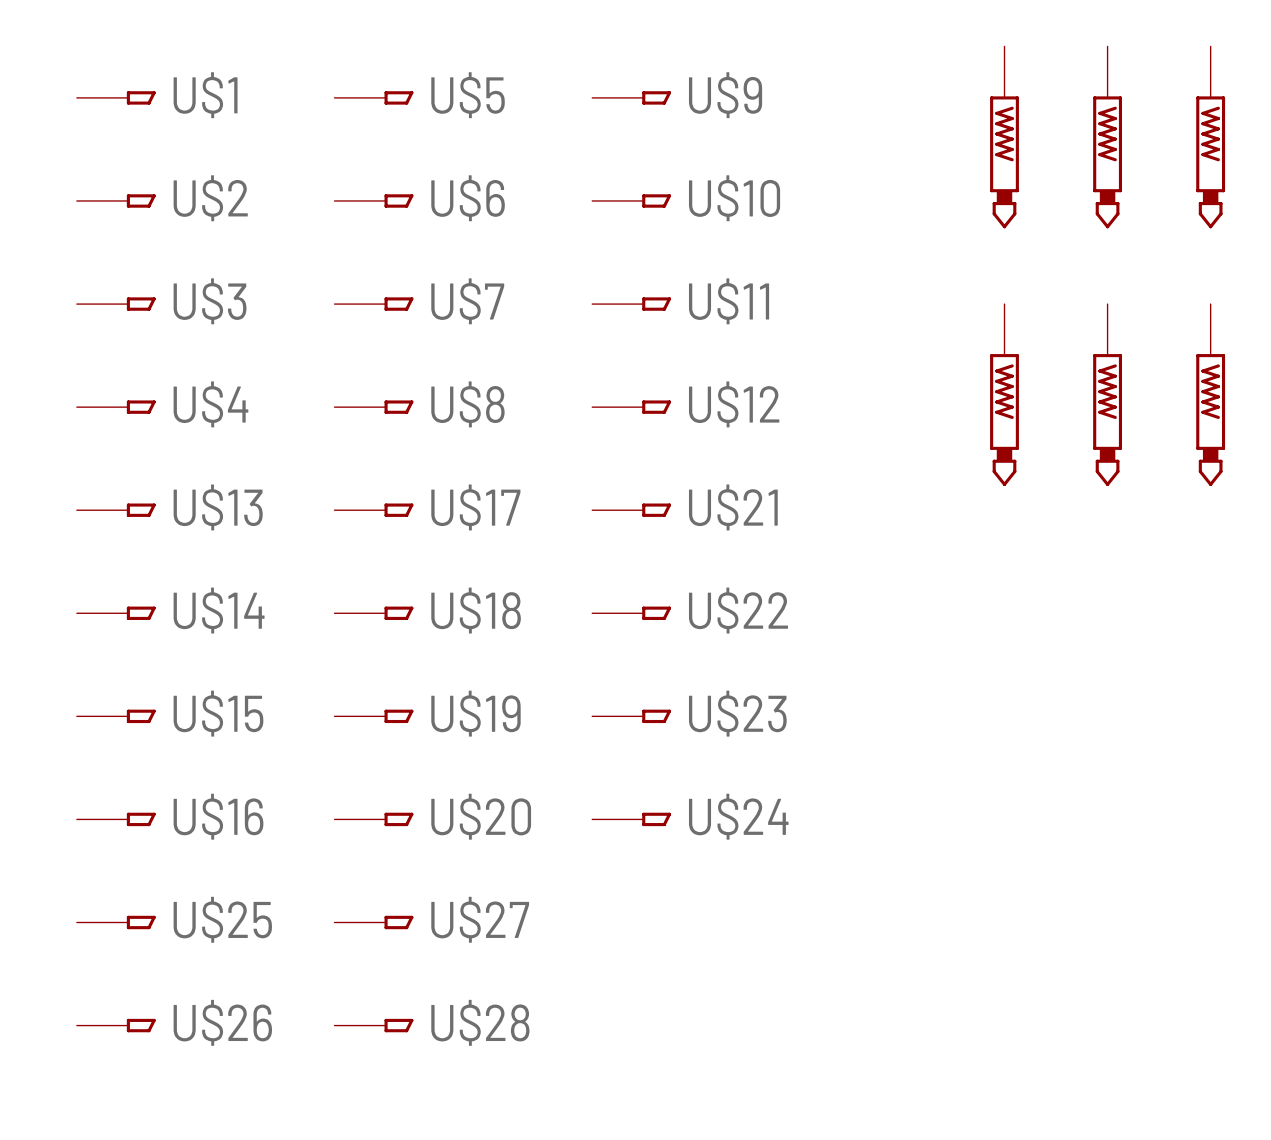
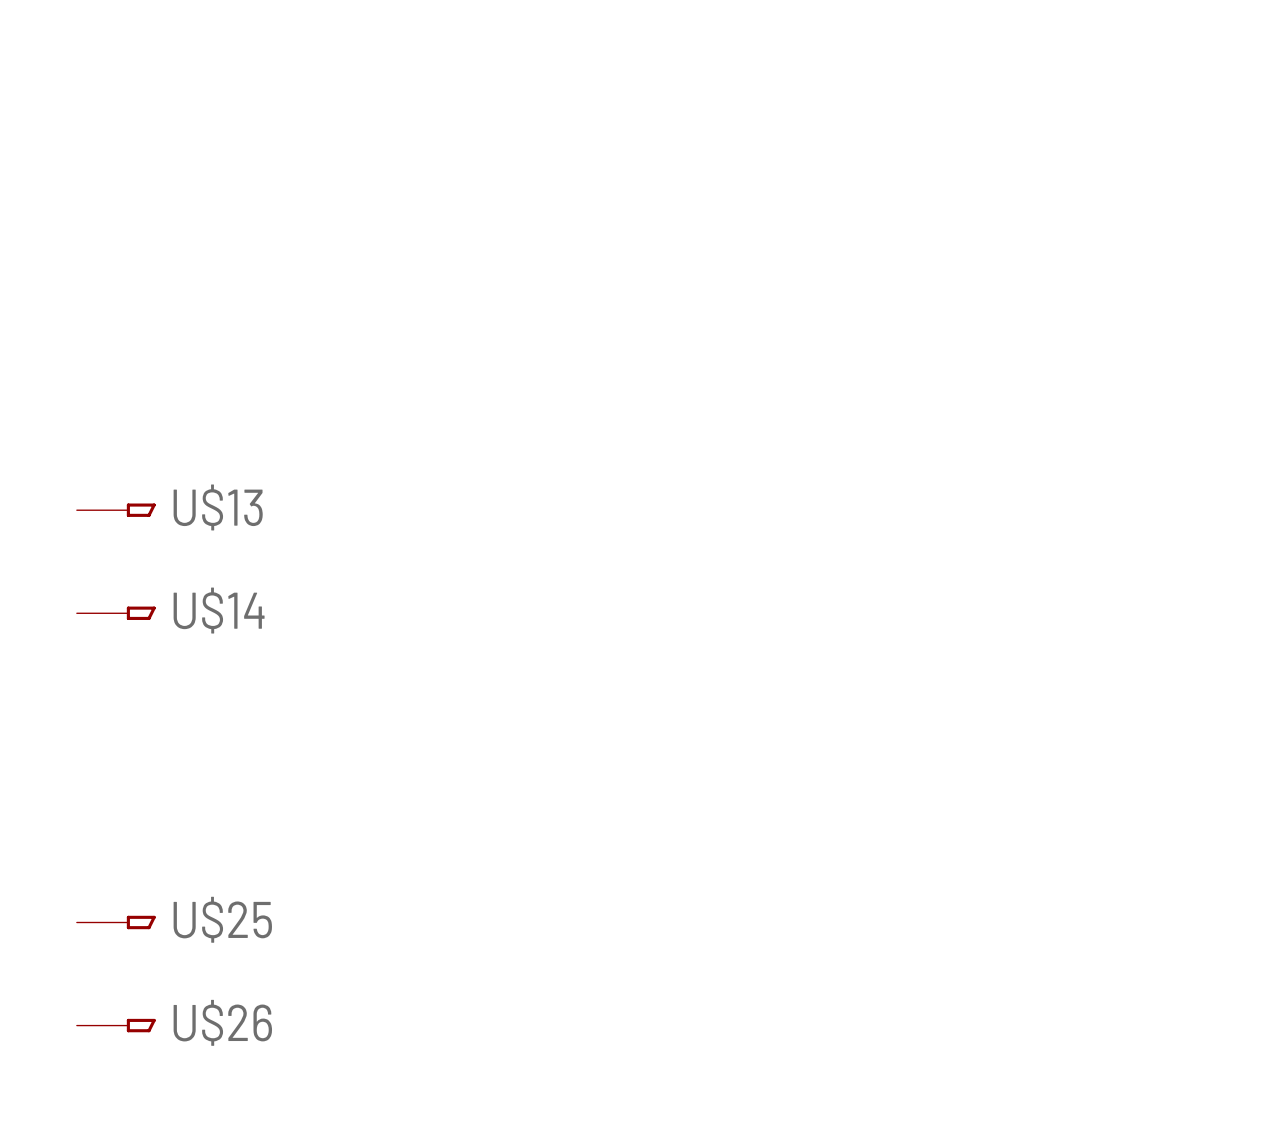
U$1: (116, 97) -> none
U$5: (373, 97) -> none
U$9: (631, 97) -> none
part: (1004, 137) -> none
part: (1107, 137) -> none
part: (1210, 137) -> none
U$2: (116, 200) -> none
U$6: (373, 200) -> none
U$10: (631, 200) -> none
U$3: (116, 304) -> none
U$7: (373, 304) -> none
U$11: (631, 304) -> none
part: (1004, 395) -> none
part: (1107, 395) -> none
part: (1210, 395) -> none
U$4: (116, 407) -> none
U$8: (373, 407) -> none
U$12: (631, 407) -> none
U$17: (373, 510) -> none
U$21: (631, 510) -> none
U$18: (373, 613) -> none
U$22: (631, 613) -> none
U$15: (116, 716) -> none
U$19: (373, 716) -> none
U$23: (631, 716) -> none
U$16: (116, 819) -> none
U$20: (373, 819) -> none
U$24: (631, 819) -> none
U$27: (373, 922) -> none
U$28: (373, 1025) -> none

